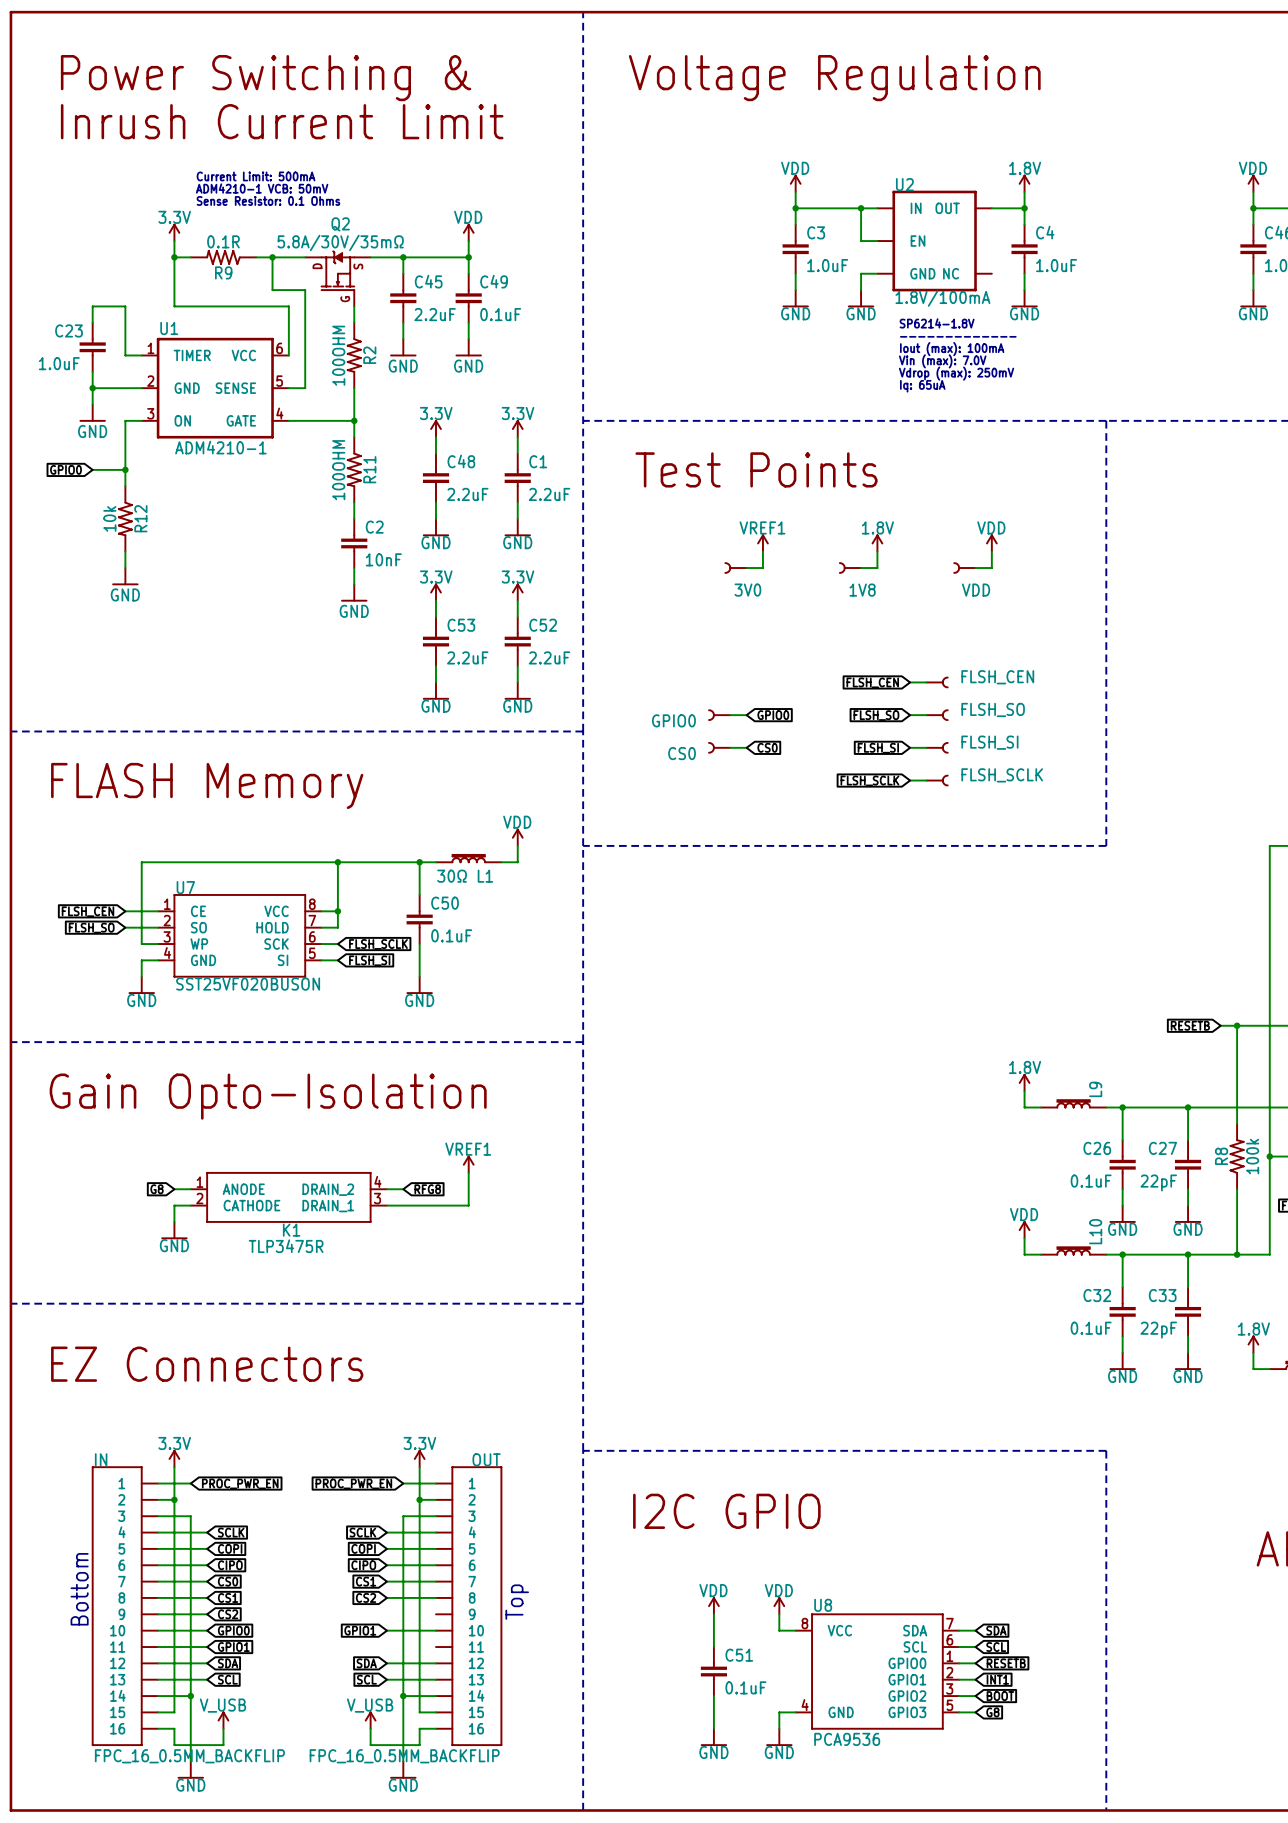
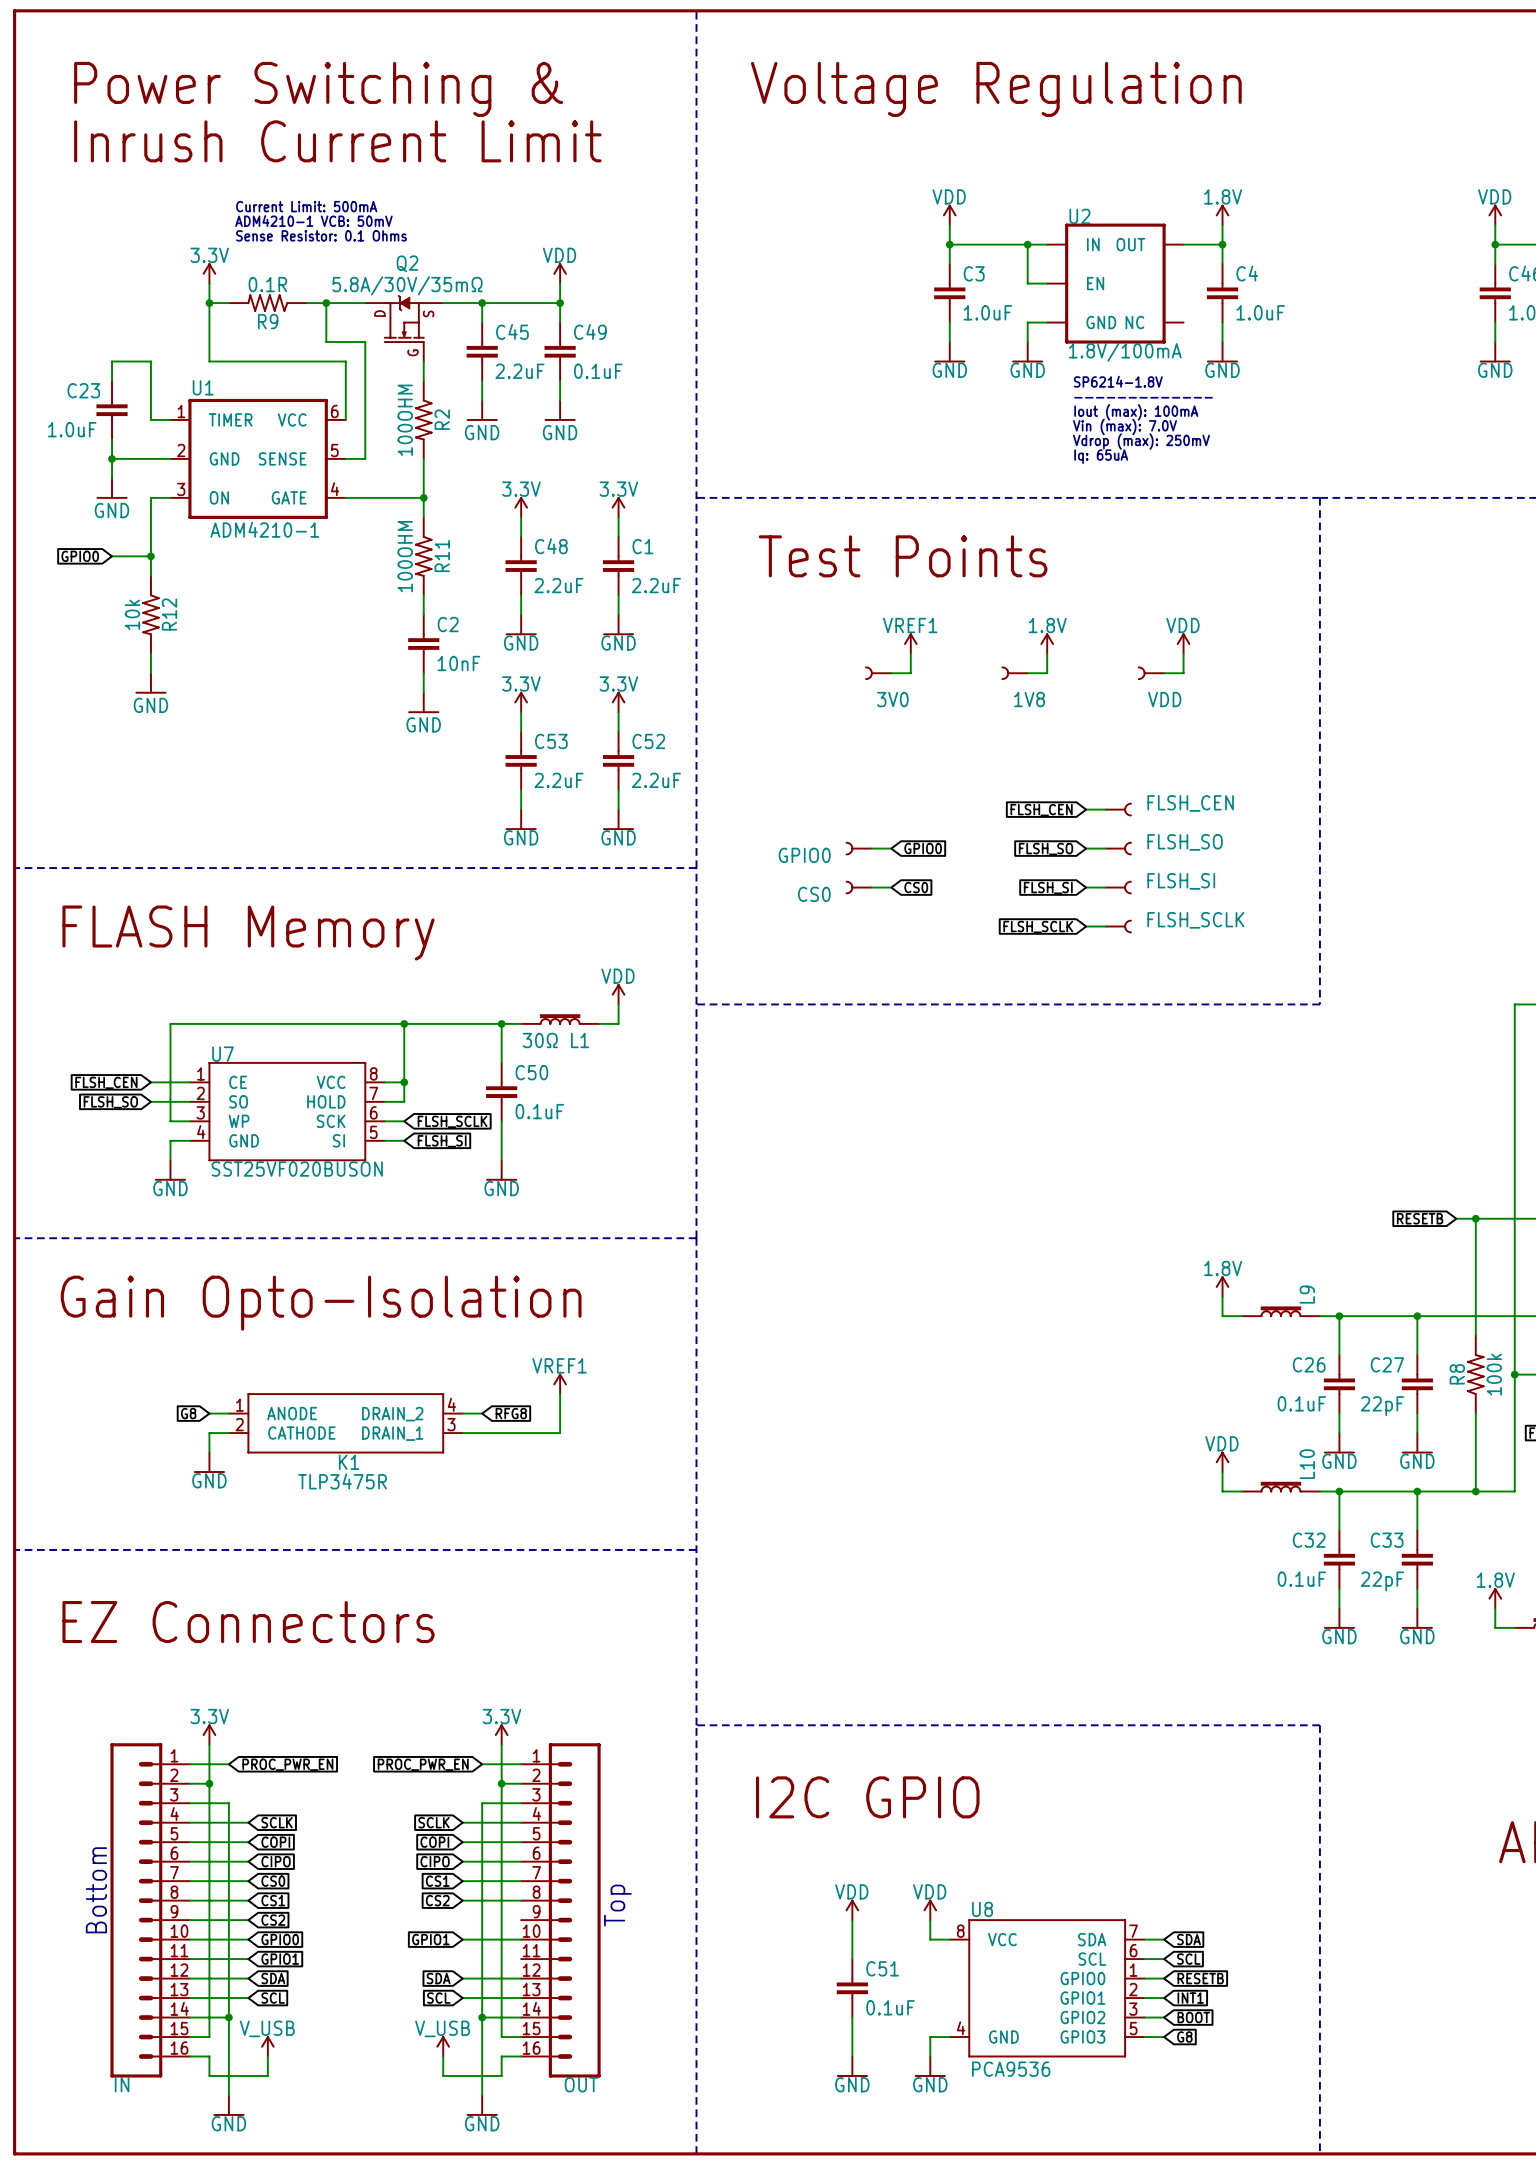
IN name position: IN (101, 1459) -> IN (122, 2084)
OUT name position: OUT (486, 1459) -> OUT (581, 2084)
IN symbol: [91, 1466, 159, 1746] -> [110, 1743, 190, 2078]
OUT symbol: [436, 1466, 503, 1746] -> [521, 1743, 601, 2078]
IN value: FPC_16_0.5MM_BACKFLIP (189, 1756) -> none
OUT value: FPC_16_0.5MM_BACKFLIP (404, 1756) -> none

